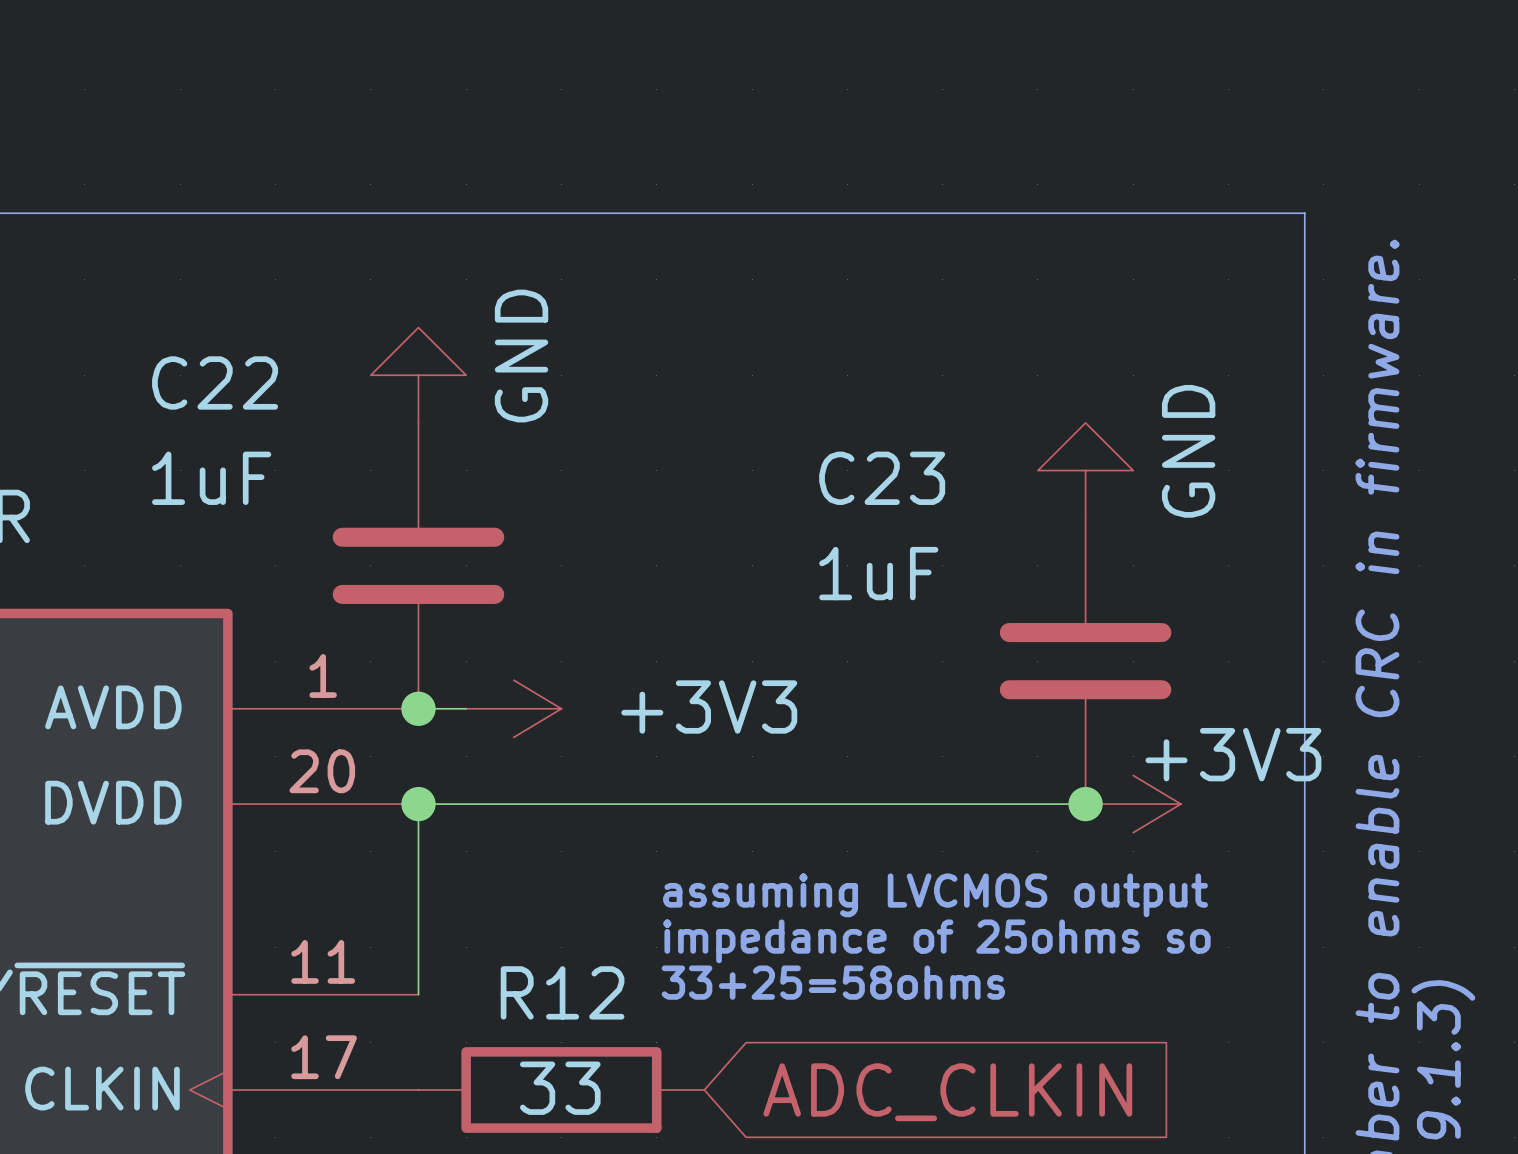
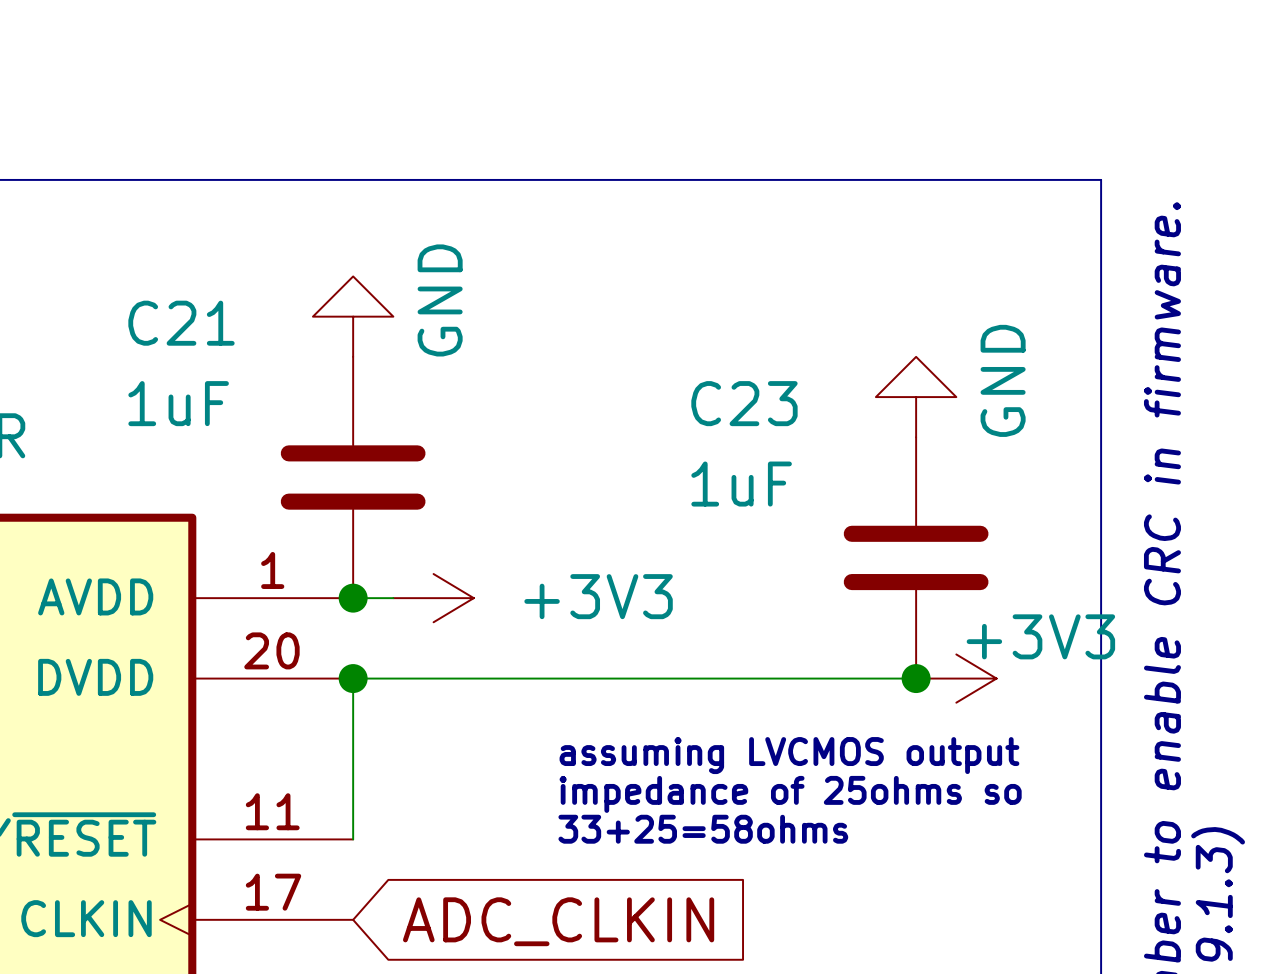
C22 name: C22 (215, 382) -> C21 (181, 323)
R12: 33 (561, 1089) -> none
global label position: ADC_CLKIN (947, 1092) -> ADC_CLKIN (558, 921)

